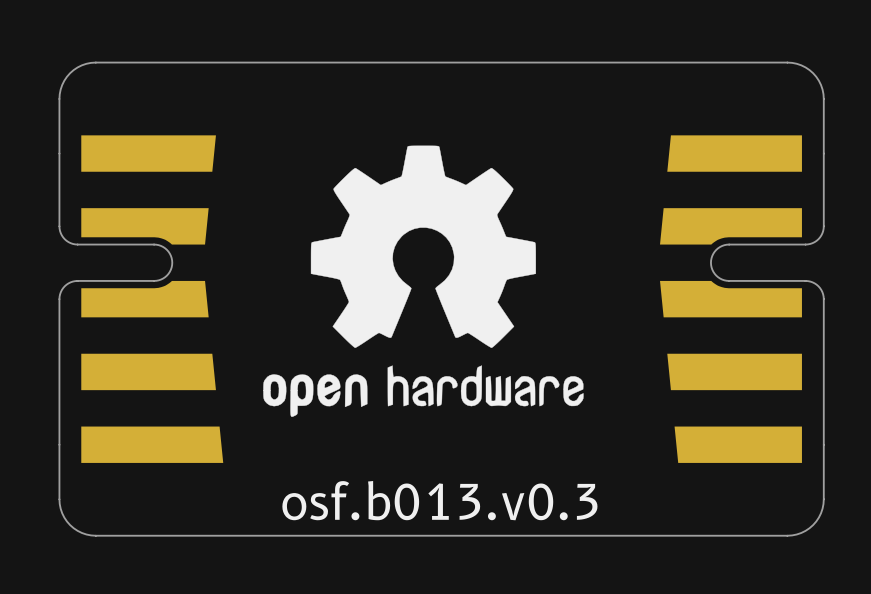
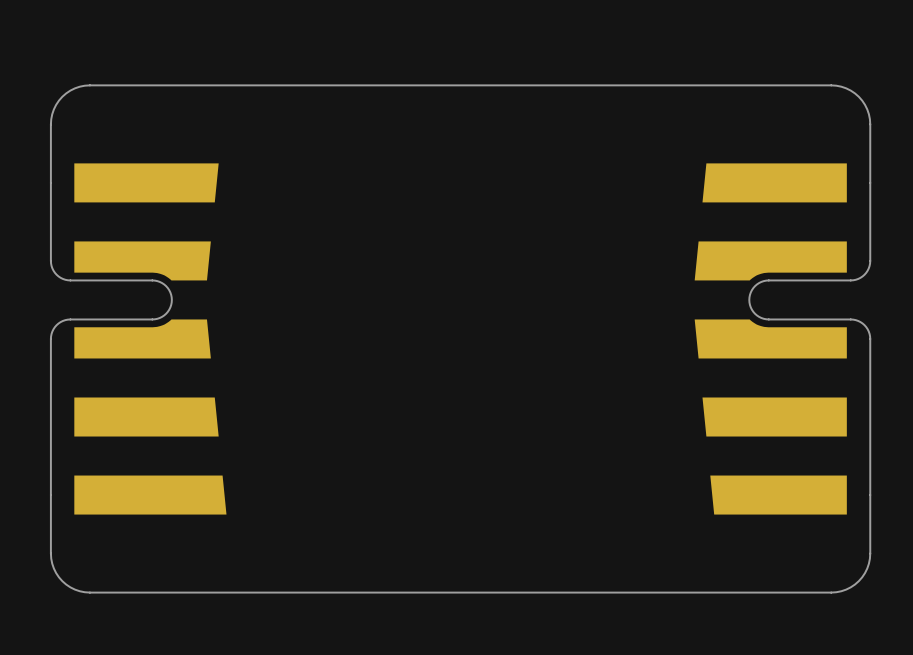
drawing: [263, 145, 584, 417] -> none
text: osf.b013.v0.3 (439, 500) -> none

